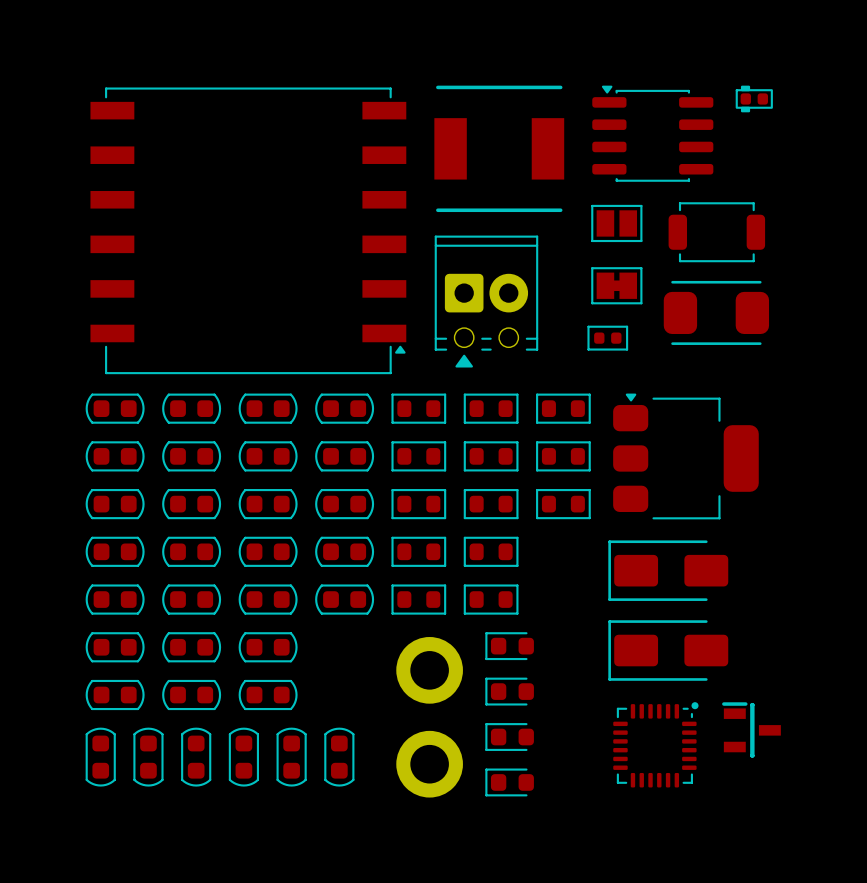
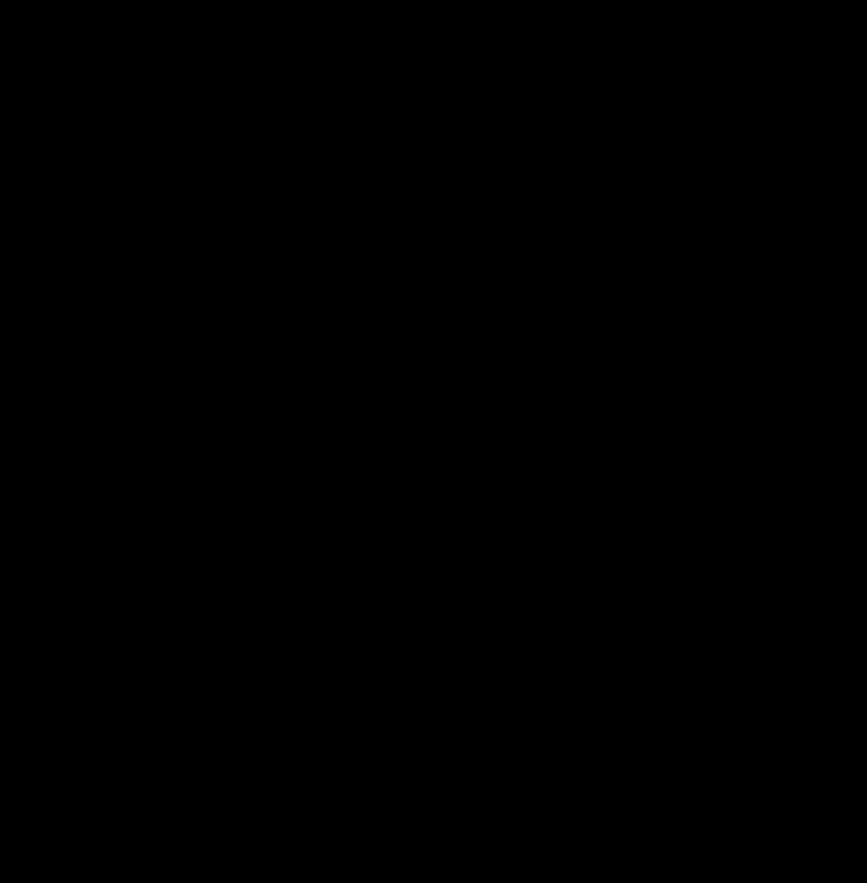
part: (754, 98) -> none
part: (652, 133) -> none
part: (499, 148) -> none
part: (616, 223) -> none
part: (248, 230) -> none
part: (716, 232) -> none
part: (616, 285) -> none
part: (486, 301) -> none
part: (716, 312) -> none
part: (607, 338) -> none
part: (115, 408) -> none
part: (191, 408) -> none
part: (268, 408) -> none
part: (344, 408) -> none
part: (418, 408) -> none
part: (491, 408) -> none
part: (563, 408) -> none
part: (115, 456) -> none
part: (191, 456) -> none
part: (268, 456) -> none
part: (344, 456) -> none
part: (418, 456) -> none
part: (491, 456) -> none
part: (563, 456) -> none
part: (685, 456) -> none
part: (115, 504) -> none
part: (191, 504) -> none
part: (268, 504) -> none
part: (344, 504) -> none
part: (418, 504) -> none
part: (491, 504) -> none
part: (563, 504) -> none
part: (115, 551) -> none
part: (191, 551) -> none
part: (268, 551) -> none
part: (344, 551) -> none
part: (418, 551) -> none
part: (491, 551) -> none
part: (668, 570) -> none
part: (115, 599) -> none
part: (191, 599) -> none
part: (268, 599) -> none
part: (344, 599) -> none
part: (418, 599) -> none
part: (491, 599) -> none
part: (509, 646) -> none
part: (115, 647) -> none
part: (191, 647) -> none
part: (268, 647) -> none
part: (668, 650) -> none
part: (429, 670) -> none
part: (509, 691) -> none
part: (115, 694) -> none
part: (191, 694) -> none
part: (268, 694) -> none
part: (751, 729) -> none
part: (509, 737) -> none
part: (655, 744) -> none
part: (100, 757) -> none
part: (148, 757) -> none
part: (196, 757) -> none
part: (243, 757) -> none
part: (291, 757) -> none
part: (339, 757) -> none
part: (429, 764) -> none
part: (509, 782) -> none

